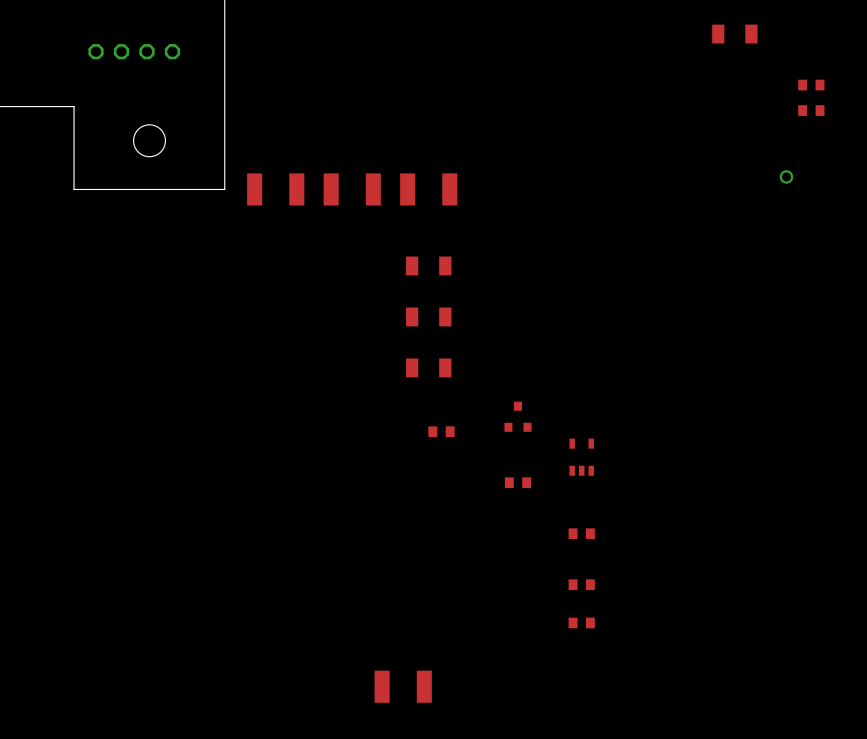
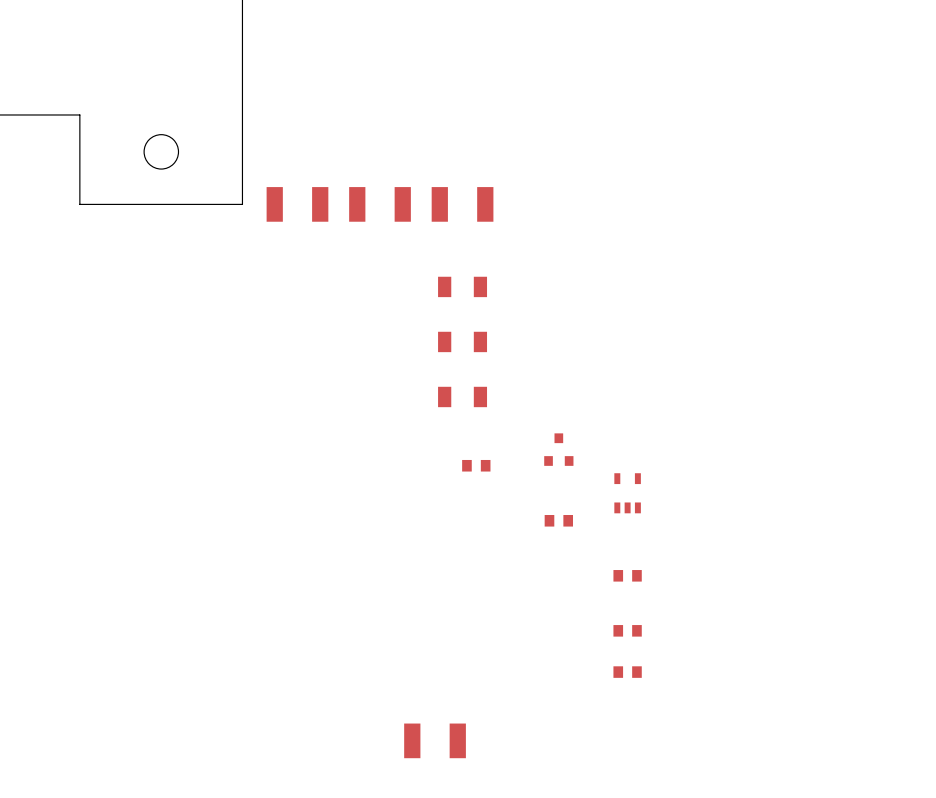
part: (734, 34) -> none
part: (134, 51) -> none
part: (811, 85) -> none
part: (811, 110) -> none
part: (786, 176) -> none

